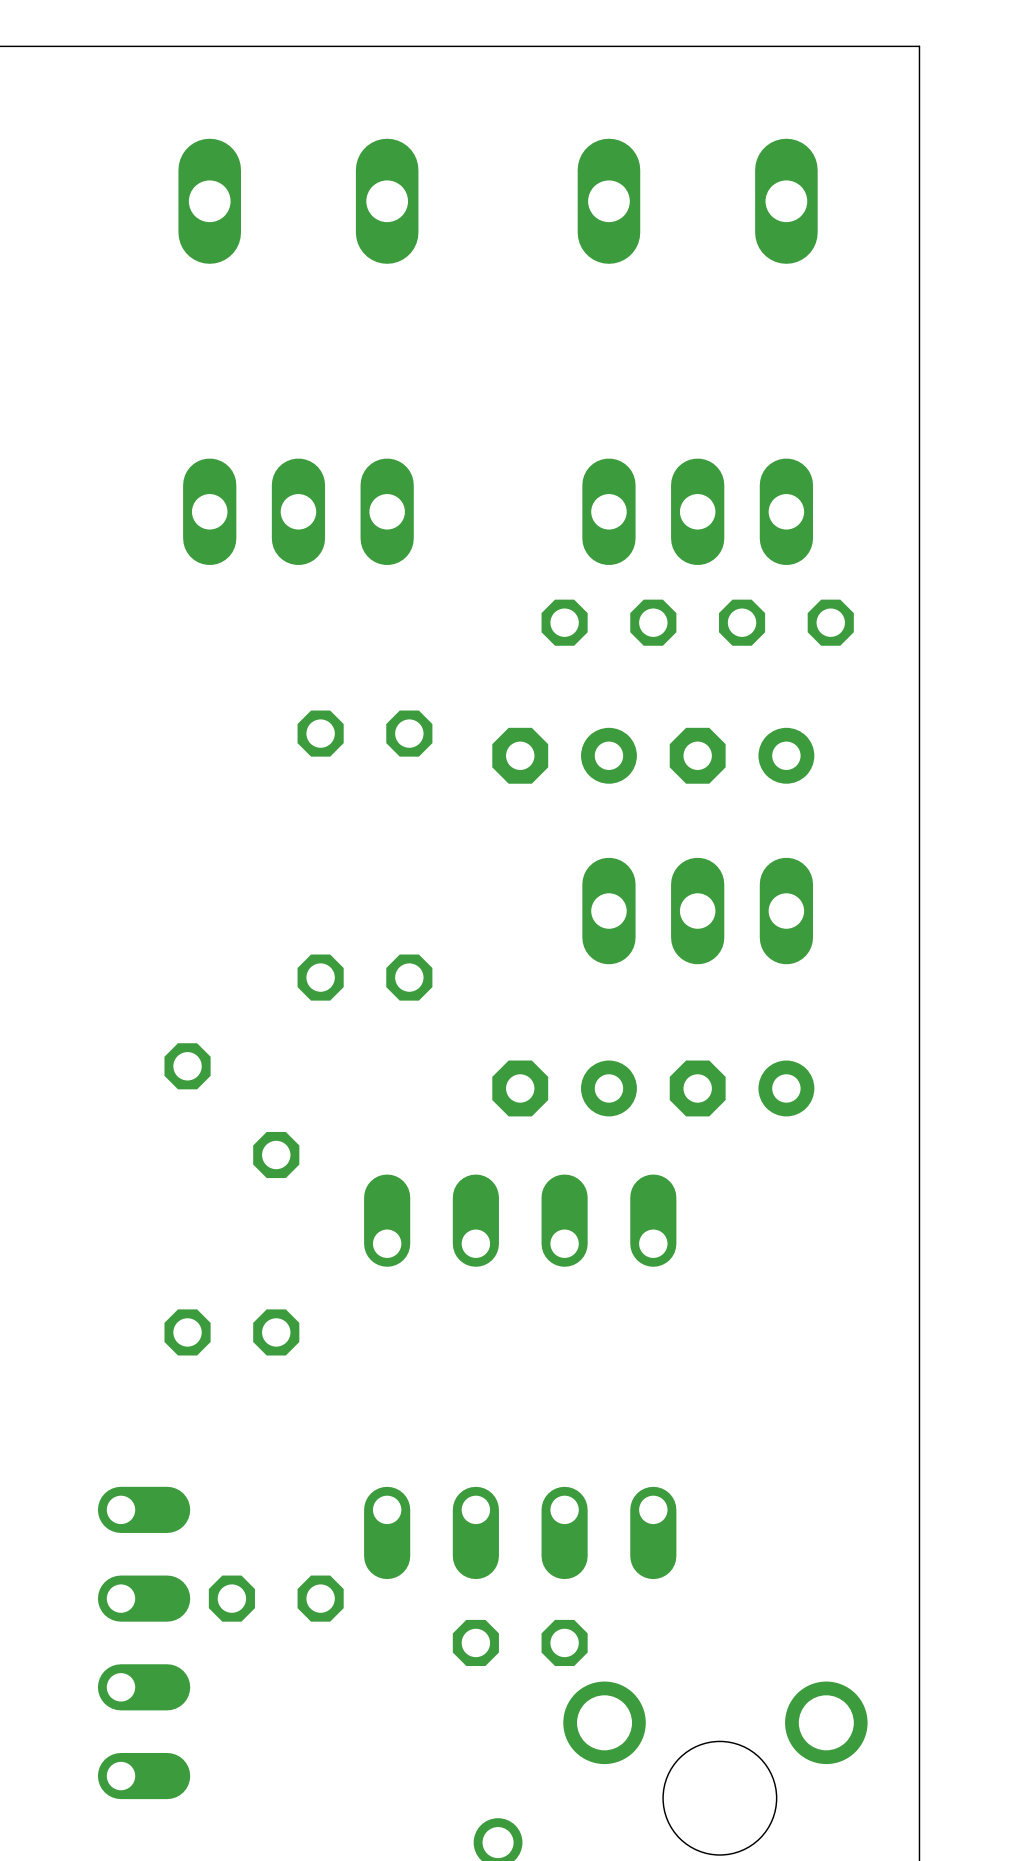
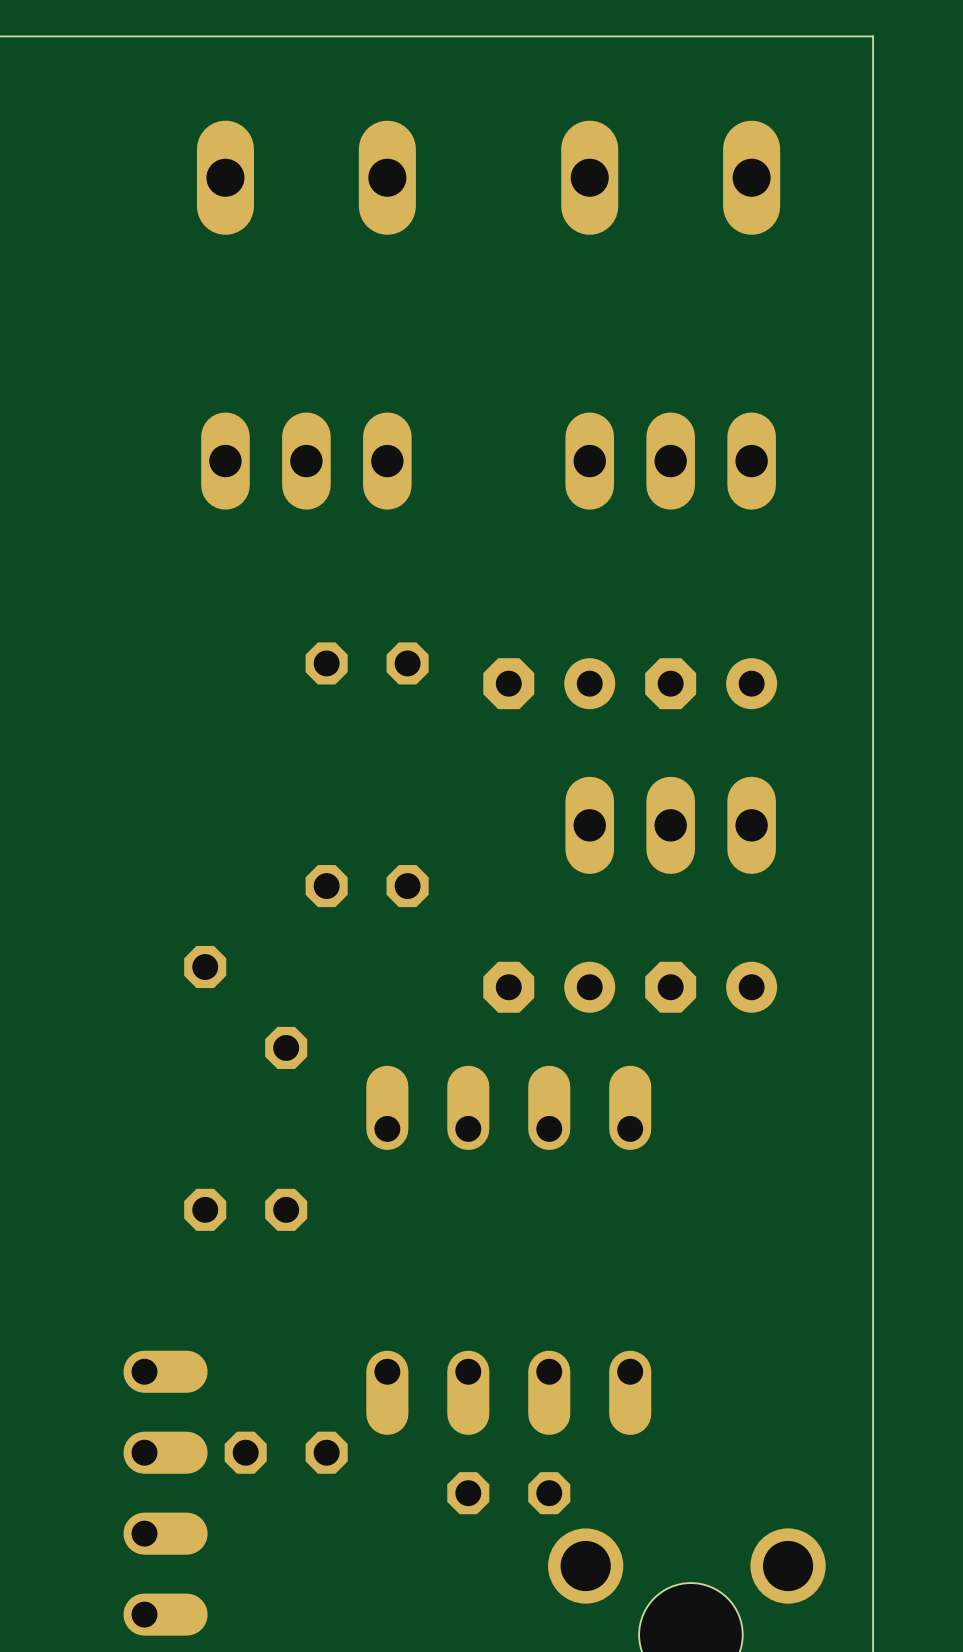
part: (608, 622) -> none
part: (786, 622) -> none

